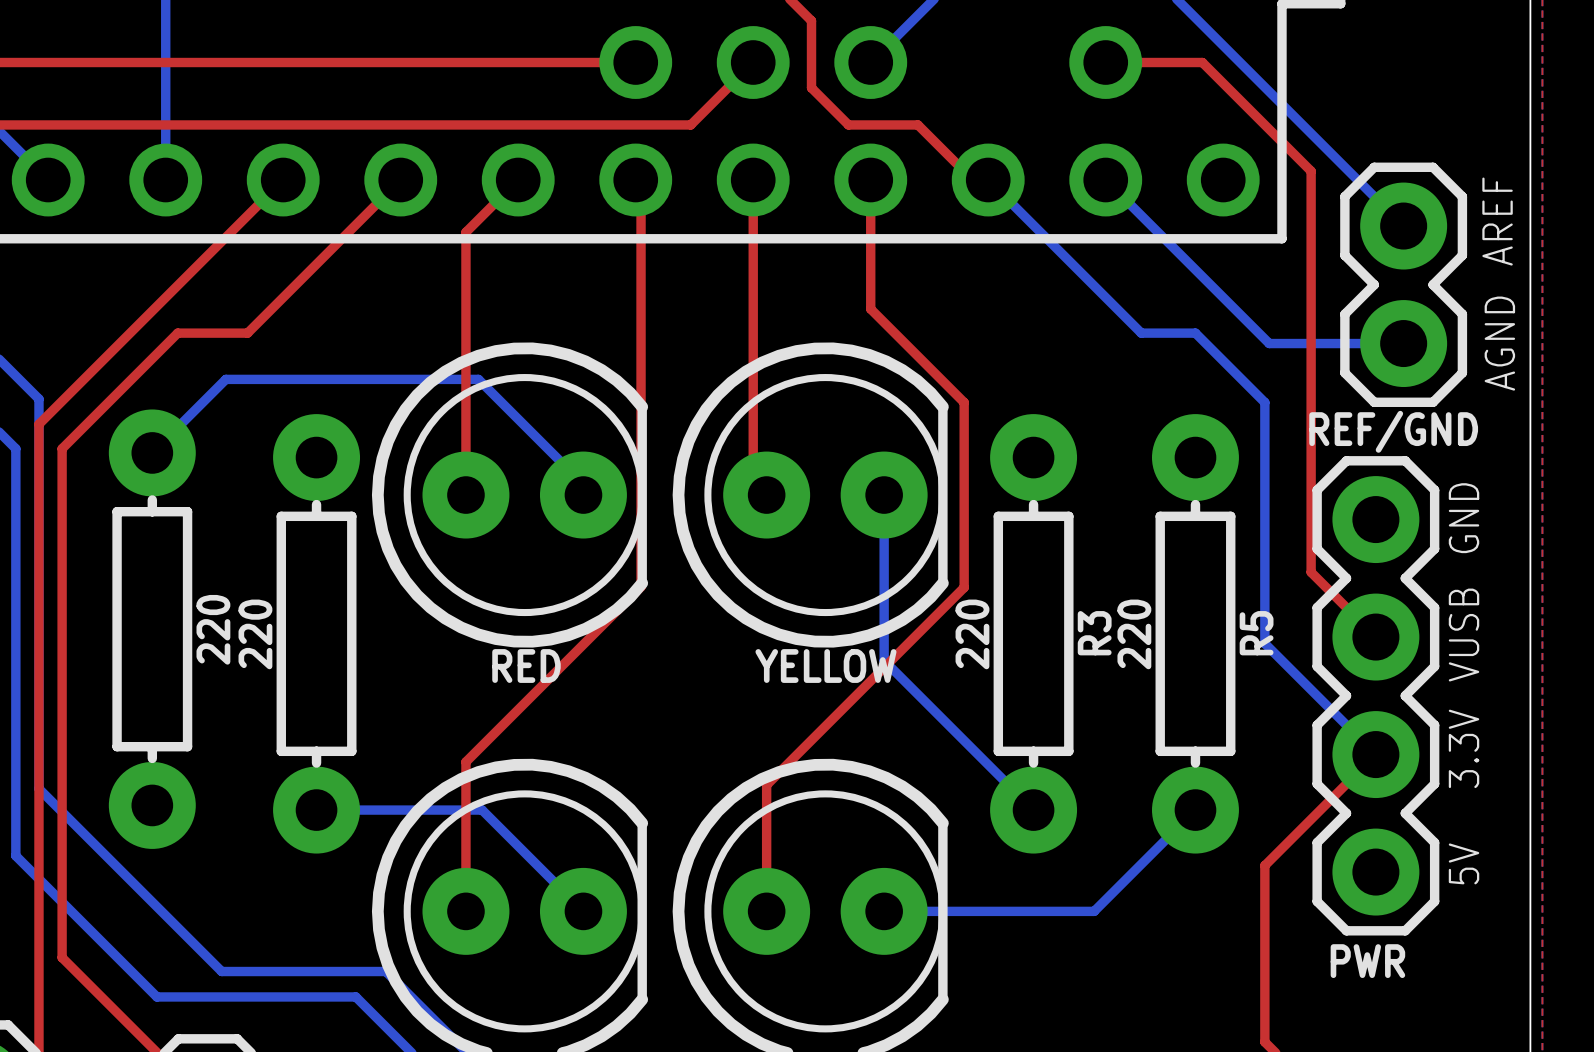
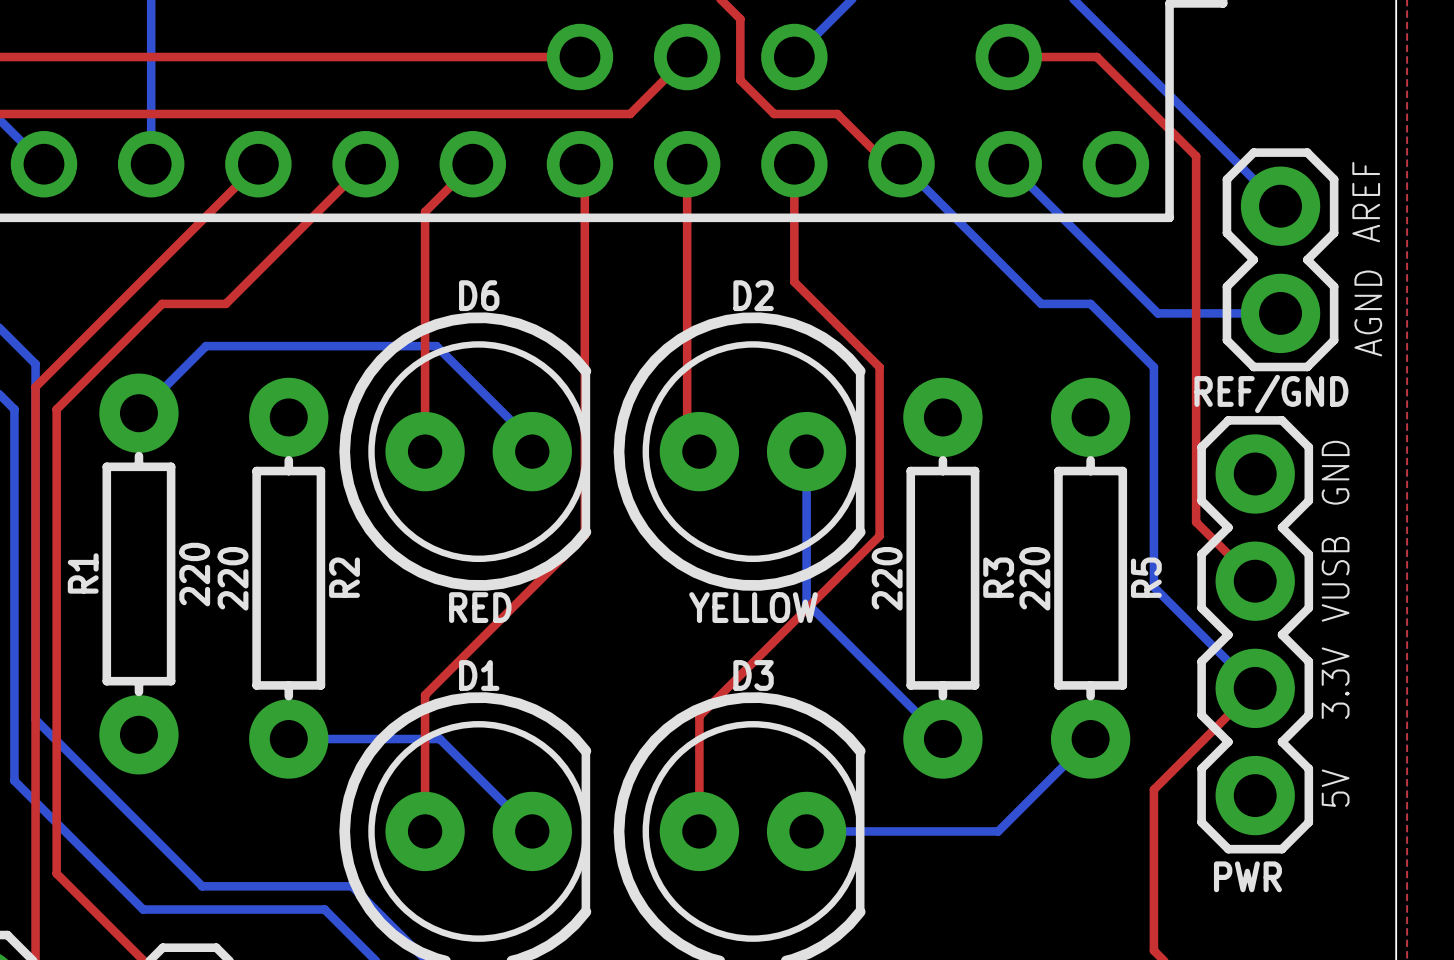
D6 name: none -> D6 (479, 295)
D2 name: none -> D2 (753, 295)
R1 name: none -> R1 (83, 573)
R2 name: none -> R2 (344, 577)
D1 name: none -> D1 (479, 675)
D3 name: none -> D3 (753, 675)

